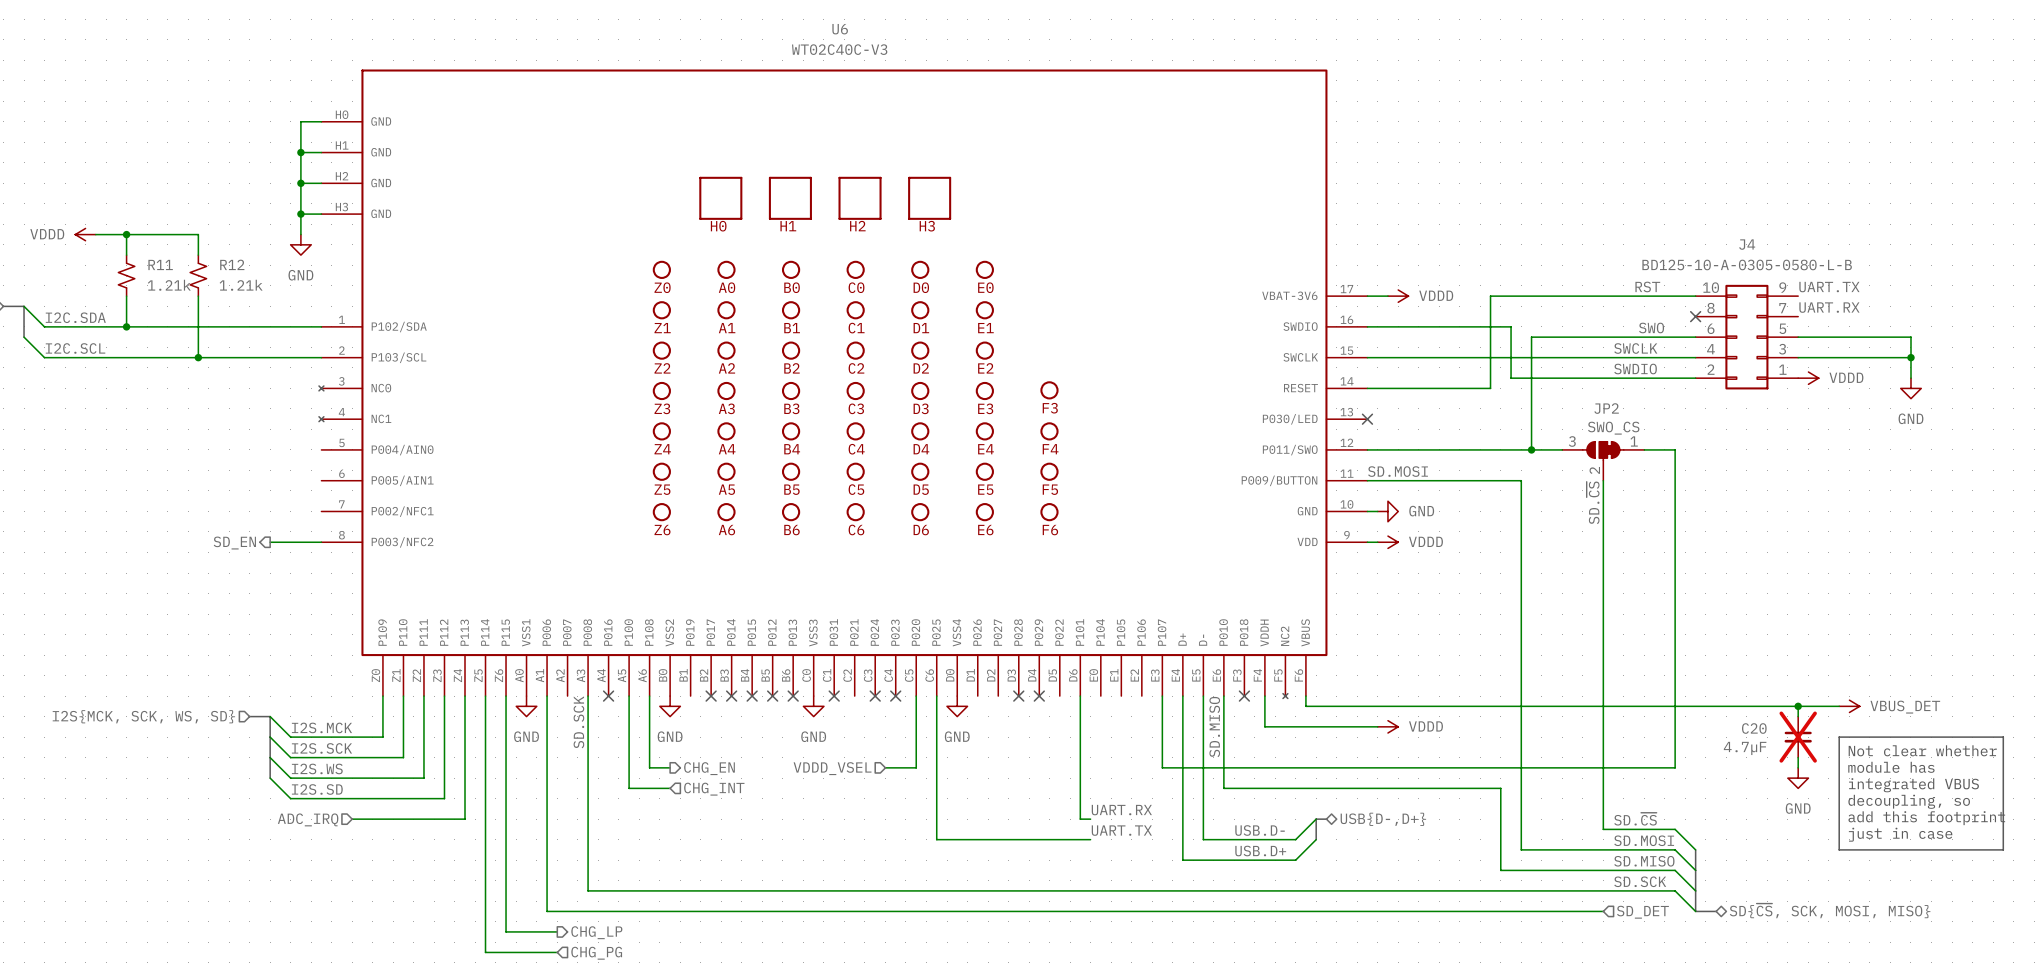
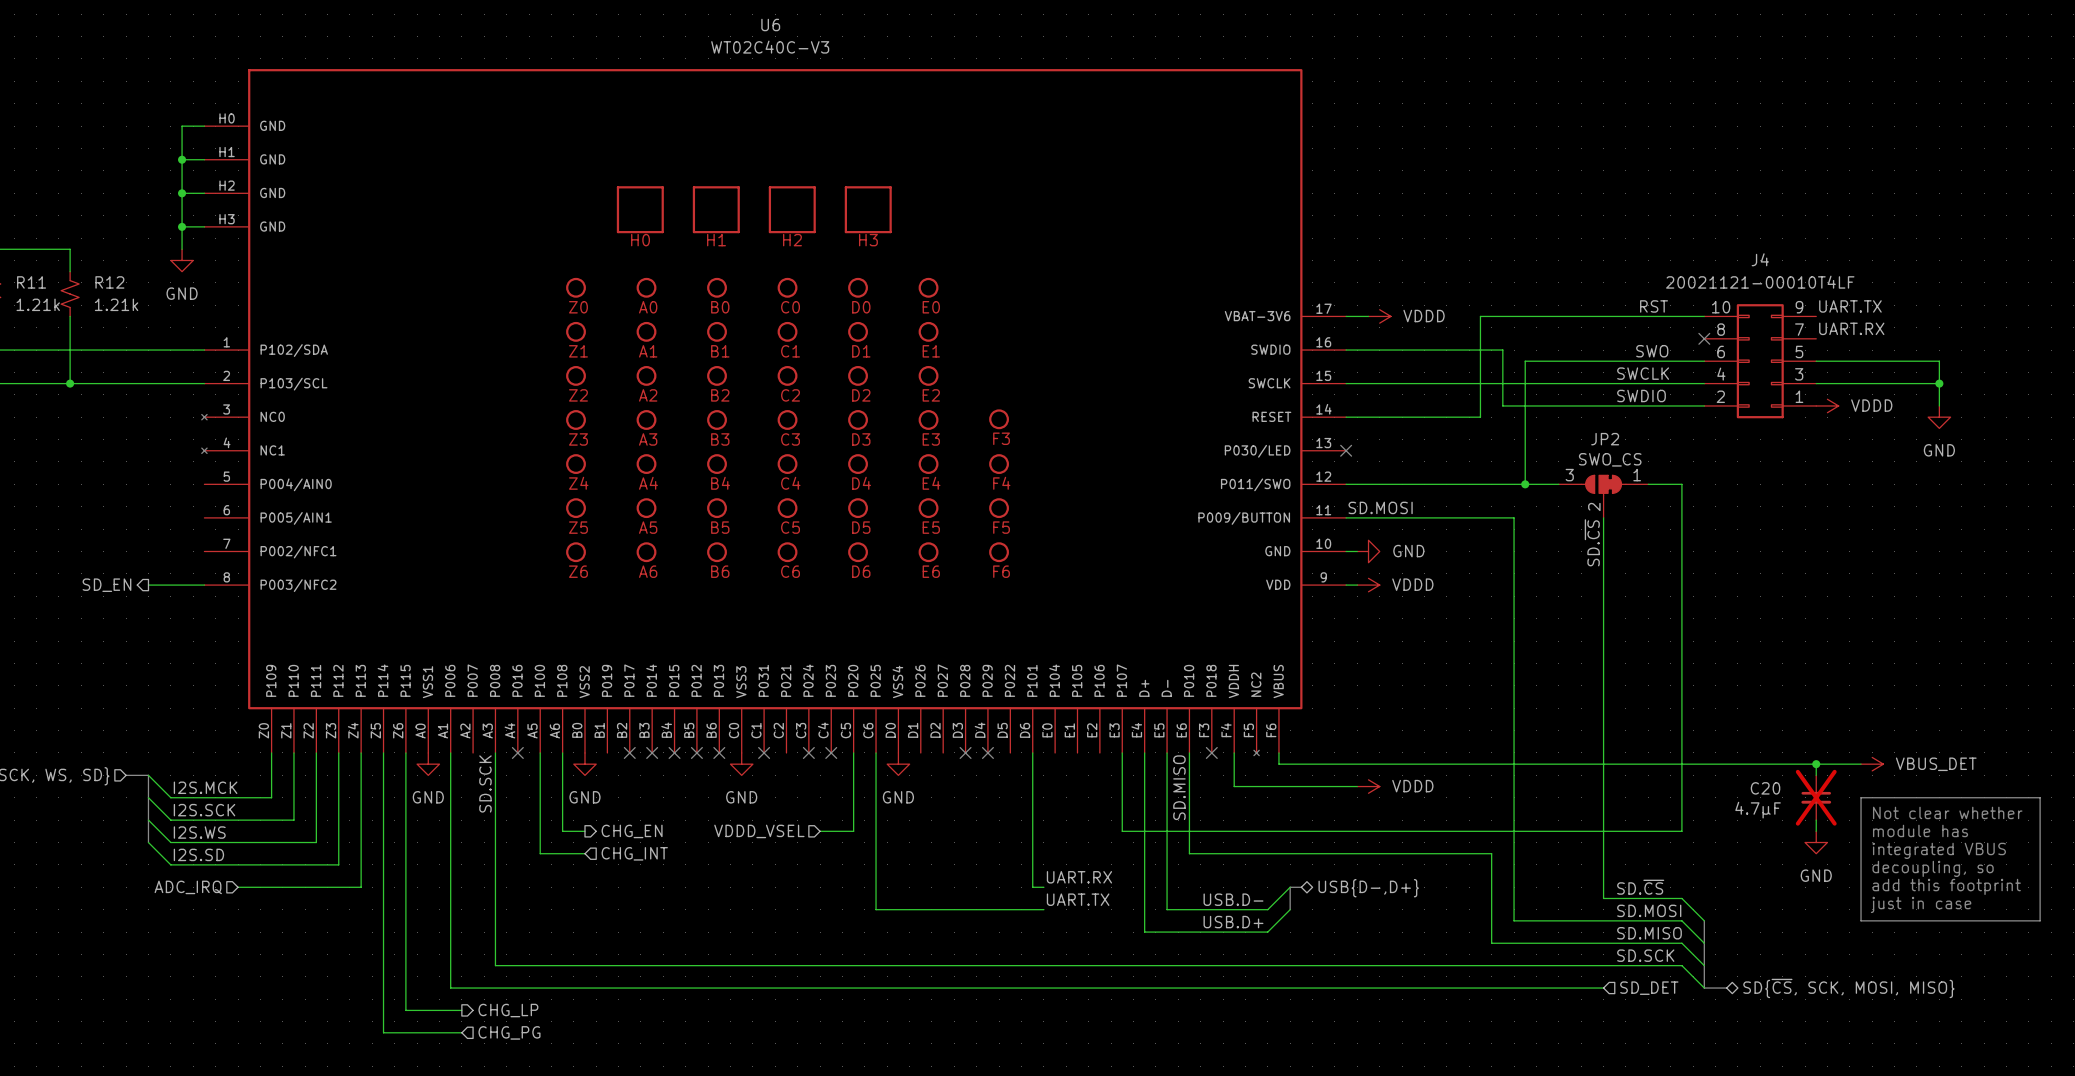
J4 value: BD125-10-A-0305-0580-L-B (1747, 264) -> 20021121-00010T4LF (1760, 282)

